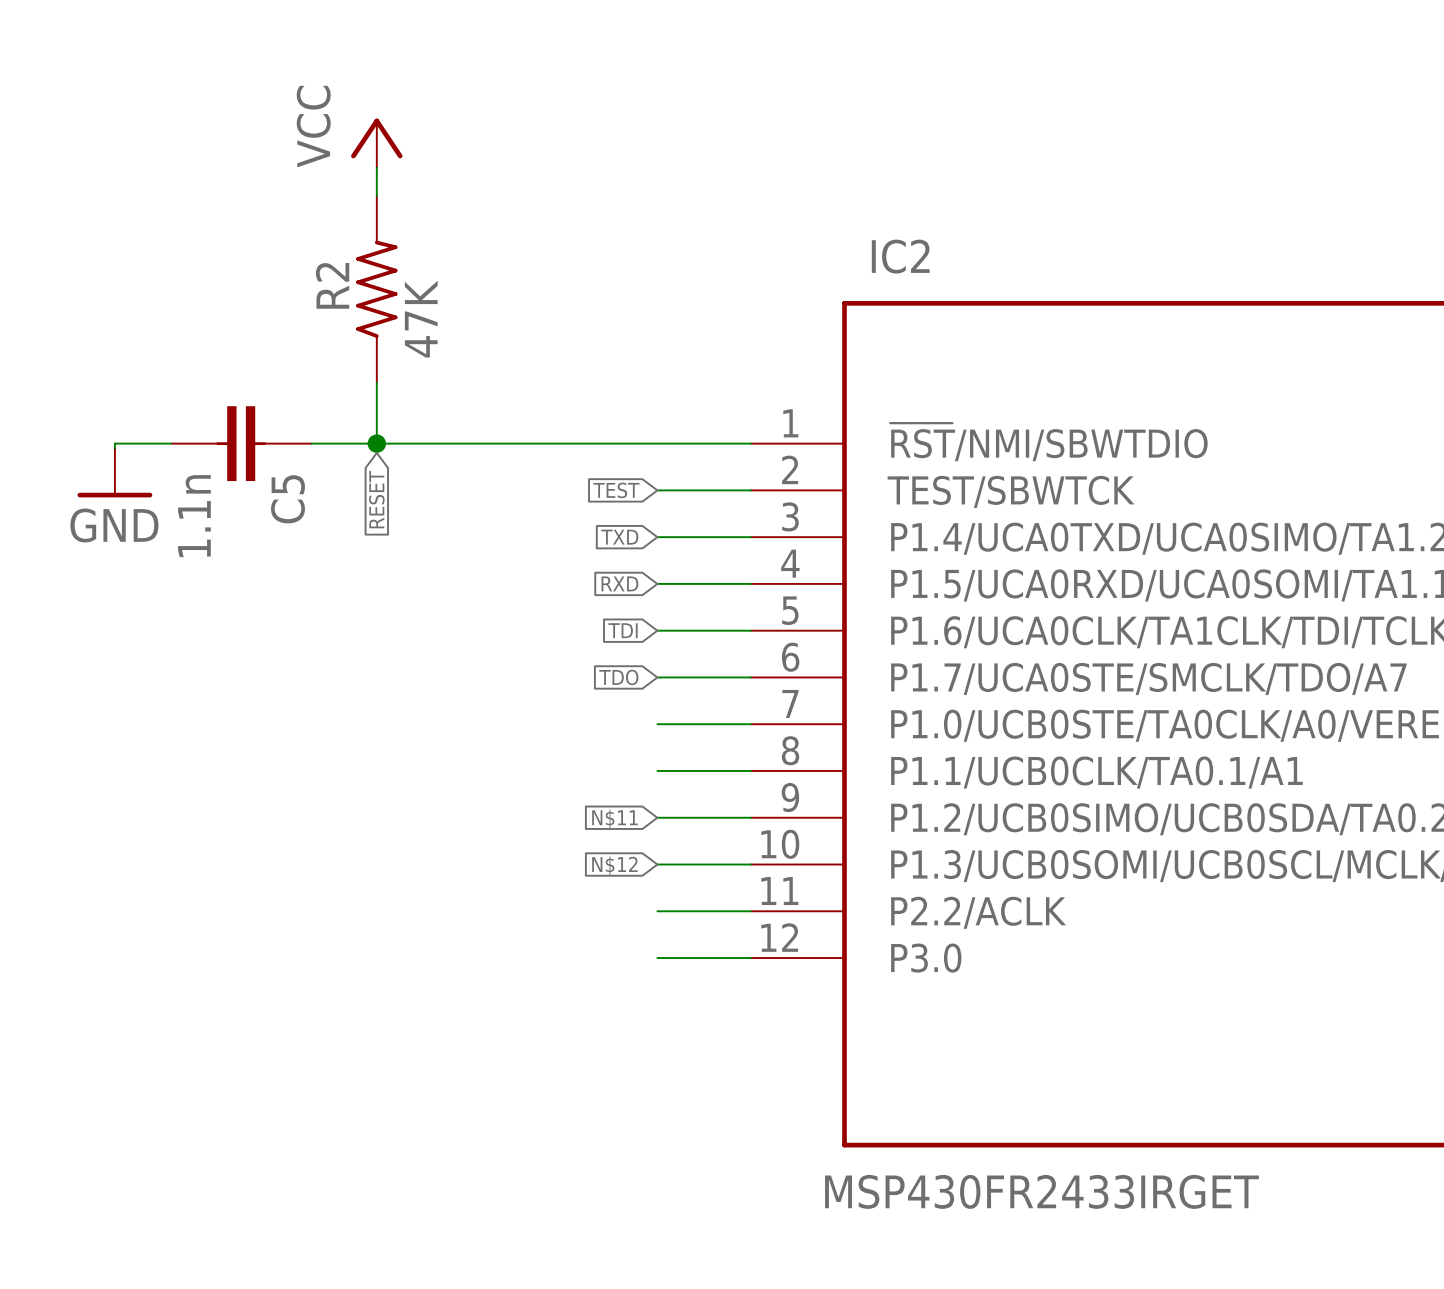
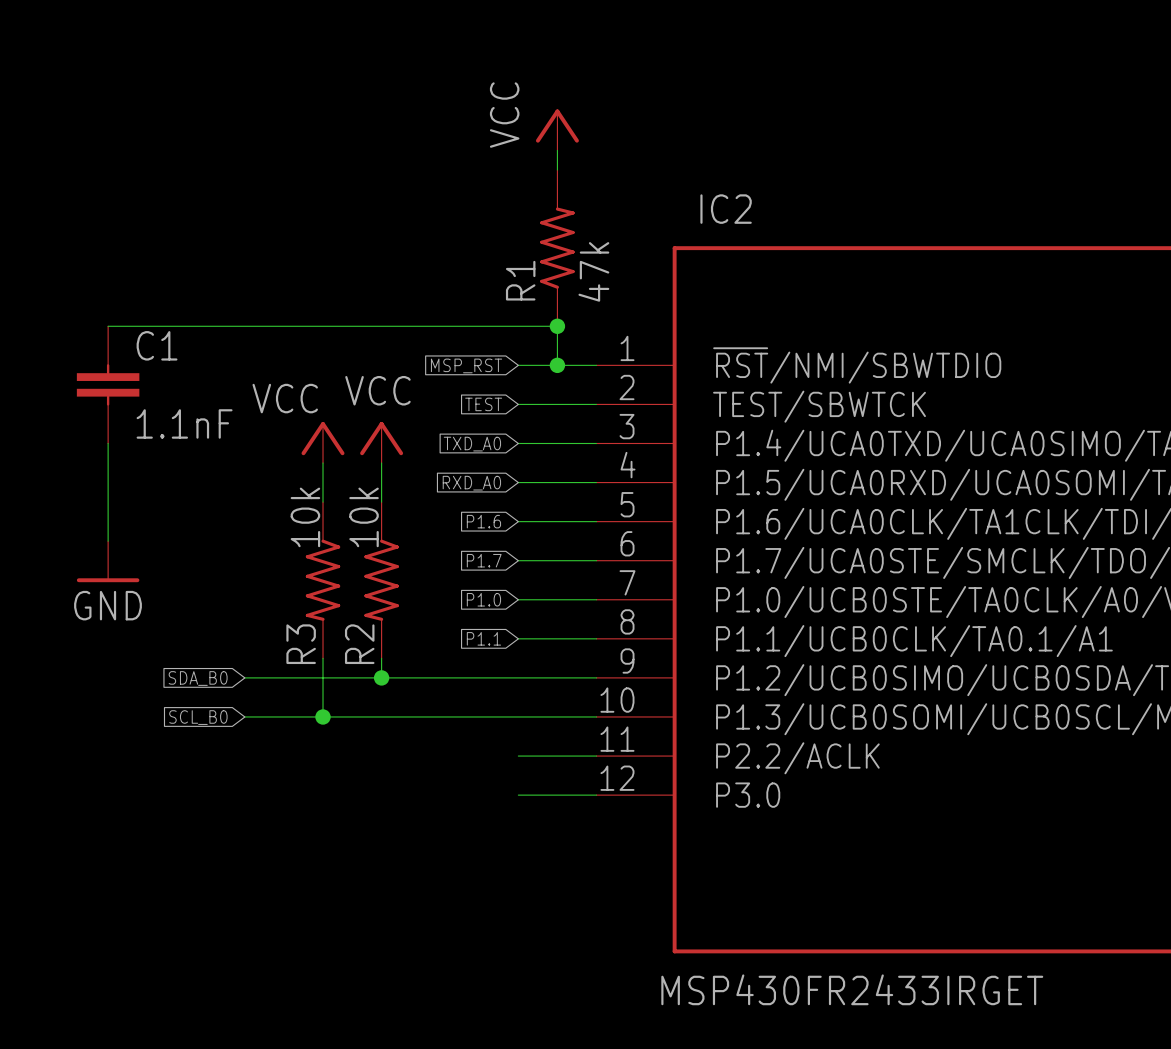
power symbol: VCC (376, 143) -> none
power symbol: none -> VCC (557, 129)
wire: (376, 167) (376, 195) -> none
wire: none -> (557, 150) (557, 170)
R2 name position: R2 (332, 285) -> R2 (359, 644)
R2 rotation: 0° (376, 289) -> 180° (381, 580)
R2 position: (376, 289) -> (381, 580)
R1: none -> 47k (557, 248)
R2 value: 47K (421, 319) -> 10k (364, 517)
wire: (376, 382) (376, 443) -> none
wire: none -> (108, 326) (557, 326) (557, 365)
junction: none -> (557, 326)
wire: (171, 443) (114, 443) (114, 448) -> none
C5: 1.1n (241, 443) -> none
wire: (311, 443) (657, 443) -> none
junction: (376, 443) -> none
junction: none -> (557, 365)
global label: none -> MSP_RST (466, 365)
C1: none -> 1.1nF (108, 384)
power symbol position: GND (114, 472) -> GND (108, 561)
global label: RESET (376, 499) -> none
power symbol: none -> VCC (323, 442)
power symbol: none -> VCC (381, 442)
wire: none -> (108, 443) (108, 541)
global label: TXD (619, 537) -> TXD_A0 (472, 444)
wire: none -> (323, 463) (323, 502)
wire: none -> (381, 463) (381, 502)
global label: RXD (619, 583) -> RXD_A0 (471, 483)
global label: TDI (623, 630) -> P1.6 (483, 521)
global label: TDO (618, 677) -> P1.7 (484, 560)
R3: none -> 10k (323, 580)
global label: none -> P1.0 (483, 599)
global label: none -> P1.1 (483, 638)
wire: none -> (323, 658) (323, 716)
wire: none -> (381, 658) (381, 677)
wire: none -> (244, 677) (518, 677)
junction: none -> (381, 677)
global label: N$11 (614, 818) -> none
global label: none -> SDA_B0 (198, 678)
wire: none -> (244, 716) (518, 716)
junction: none -> (323, 716)
global label: N$12 (614, 865) -> none
global label: none -> SCL_B0 (198, 717)

